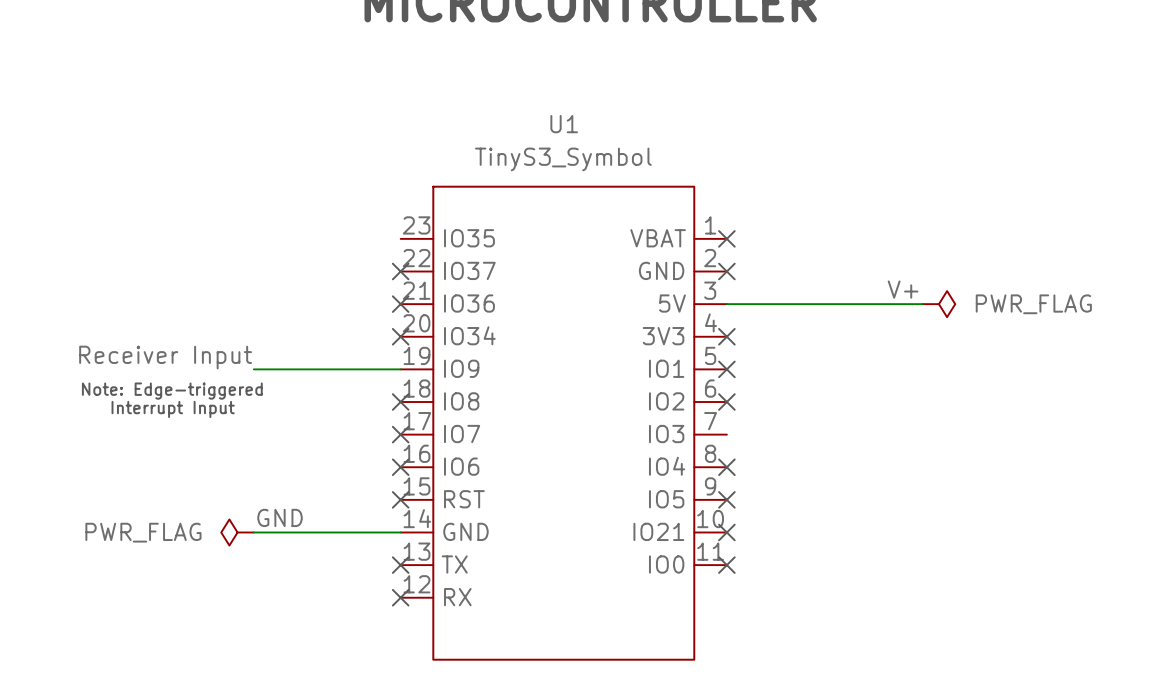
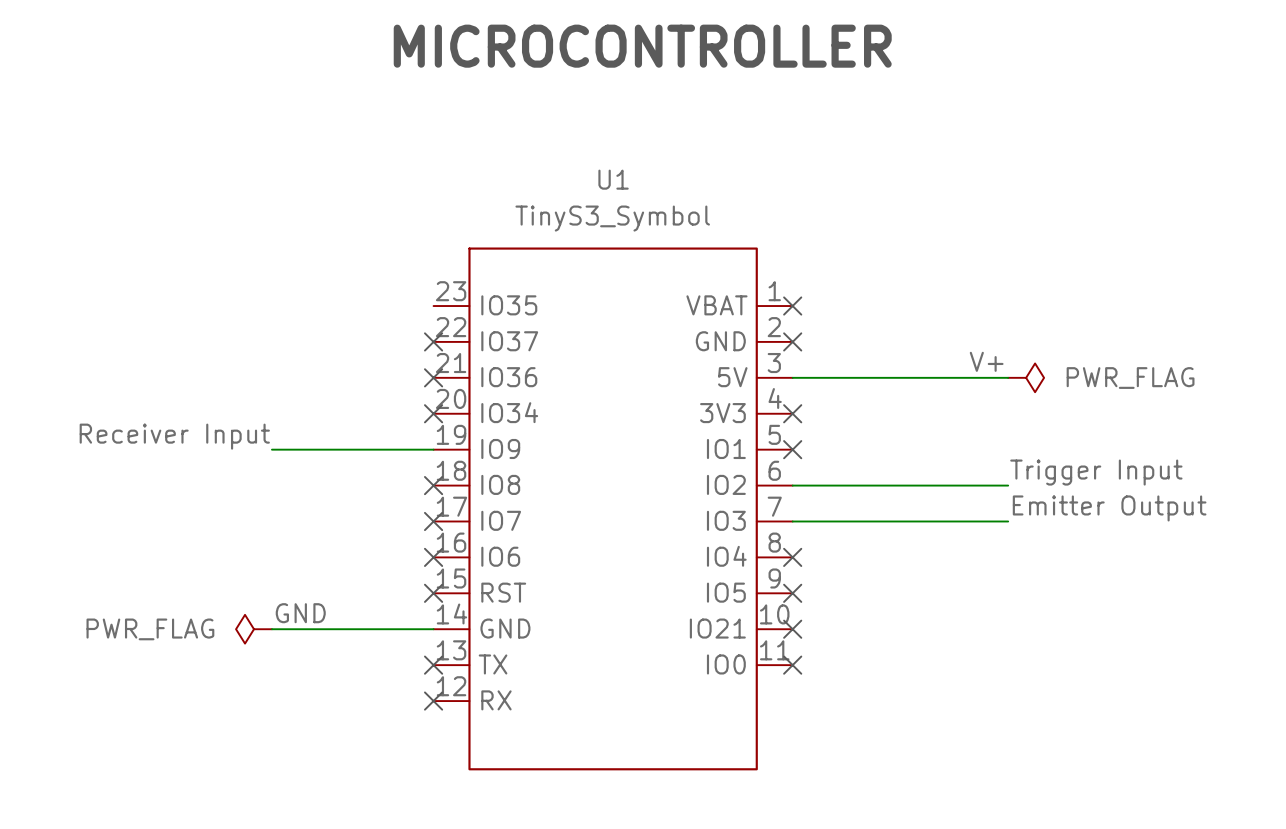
label: none -> Trigger Input (1096, 472)
text: Note: Edge-triggered (172, 391) -> none
wire: none -> (792, 485) (1008, 485)
no-connect mark: (726, 402) -> none
text: Interrupt Input (173, 409) -> none
label: none -> Emitter Output (1109, 508)
wire: none -> (792, 521) (1008, 521)

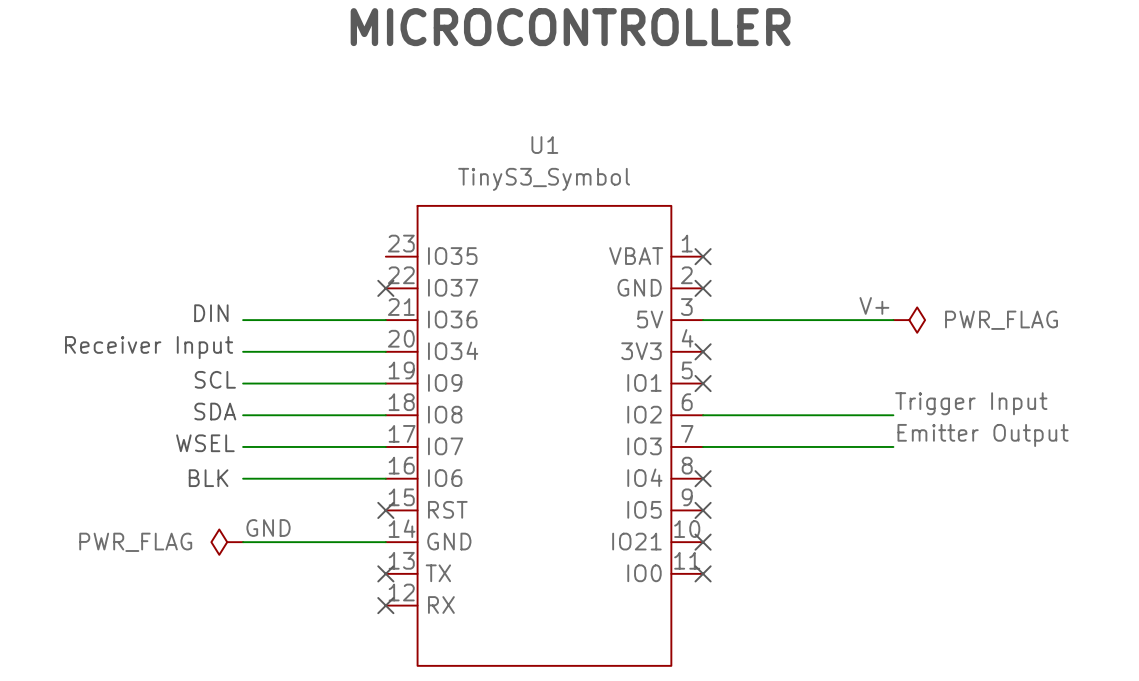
text: none -> DIN (211, 313)
wire: none -> (243, 320) (385, 320)
no-connect mark: (433, 377) -> none
text: none -> Receiver Input (149, 347)
wire: none -> (243, 351) (385, 351)
no-connect mark: (433, 413) -> none
label: Receiver Input (174, 436) -> none
text: none -> SCL (215, 379)
text: none -> SDA (215, 411)
wire: none -> (243, 415) (385, 415)
no-connect mark: (433, 485) -> none
text: none -> WSEL (205, 443)
wire: none -> (243, 446) (385, 446)
no-connect mark: (433, 521) -> none
text: none -> BLK (208, 478)
wire: none -> (243, 478) (385, 478)
no-connect mark: (433, 557) -> none

